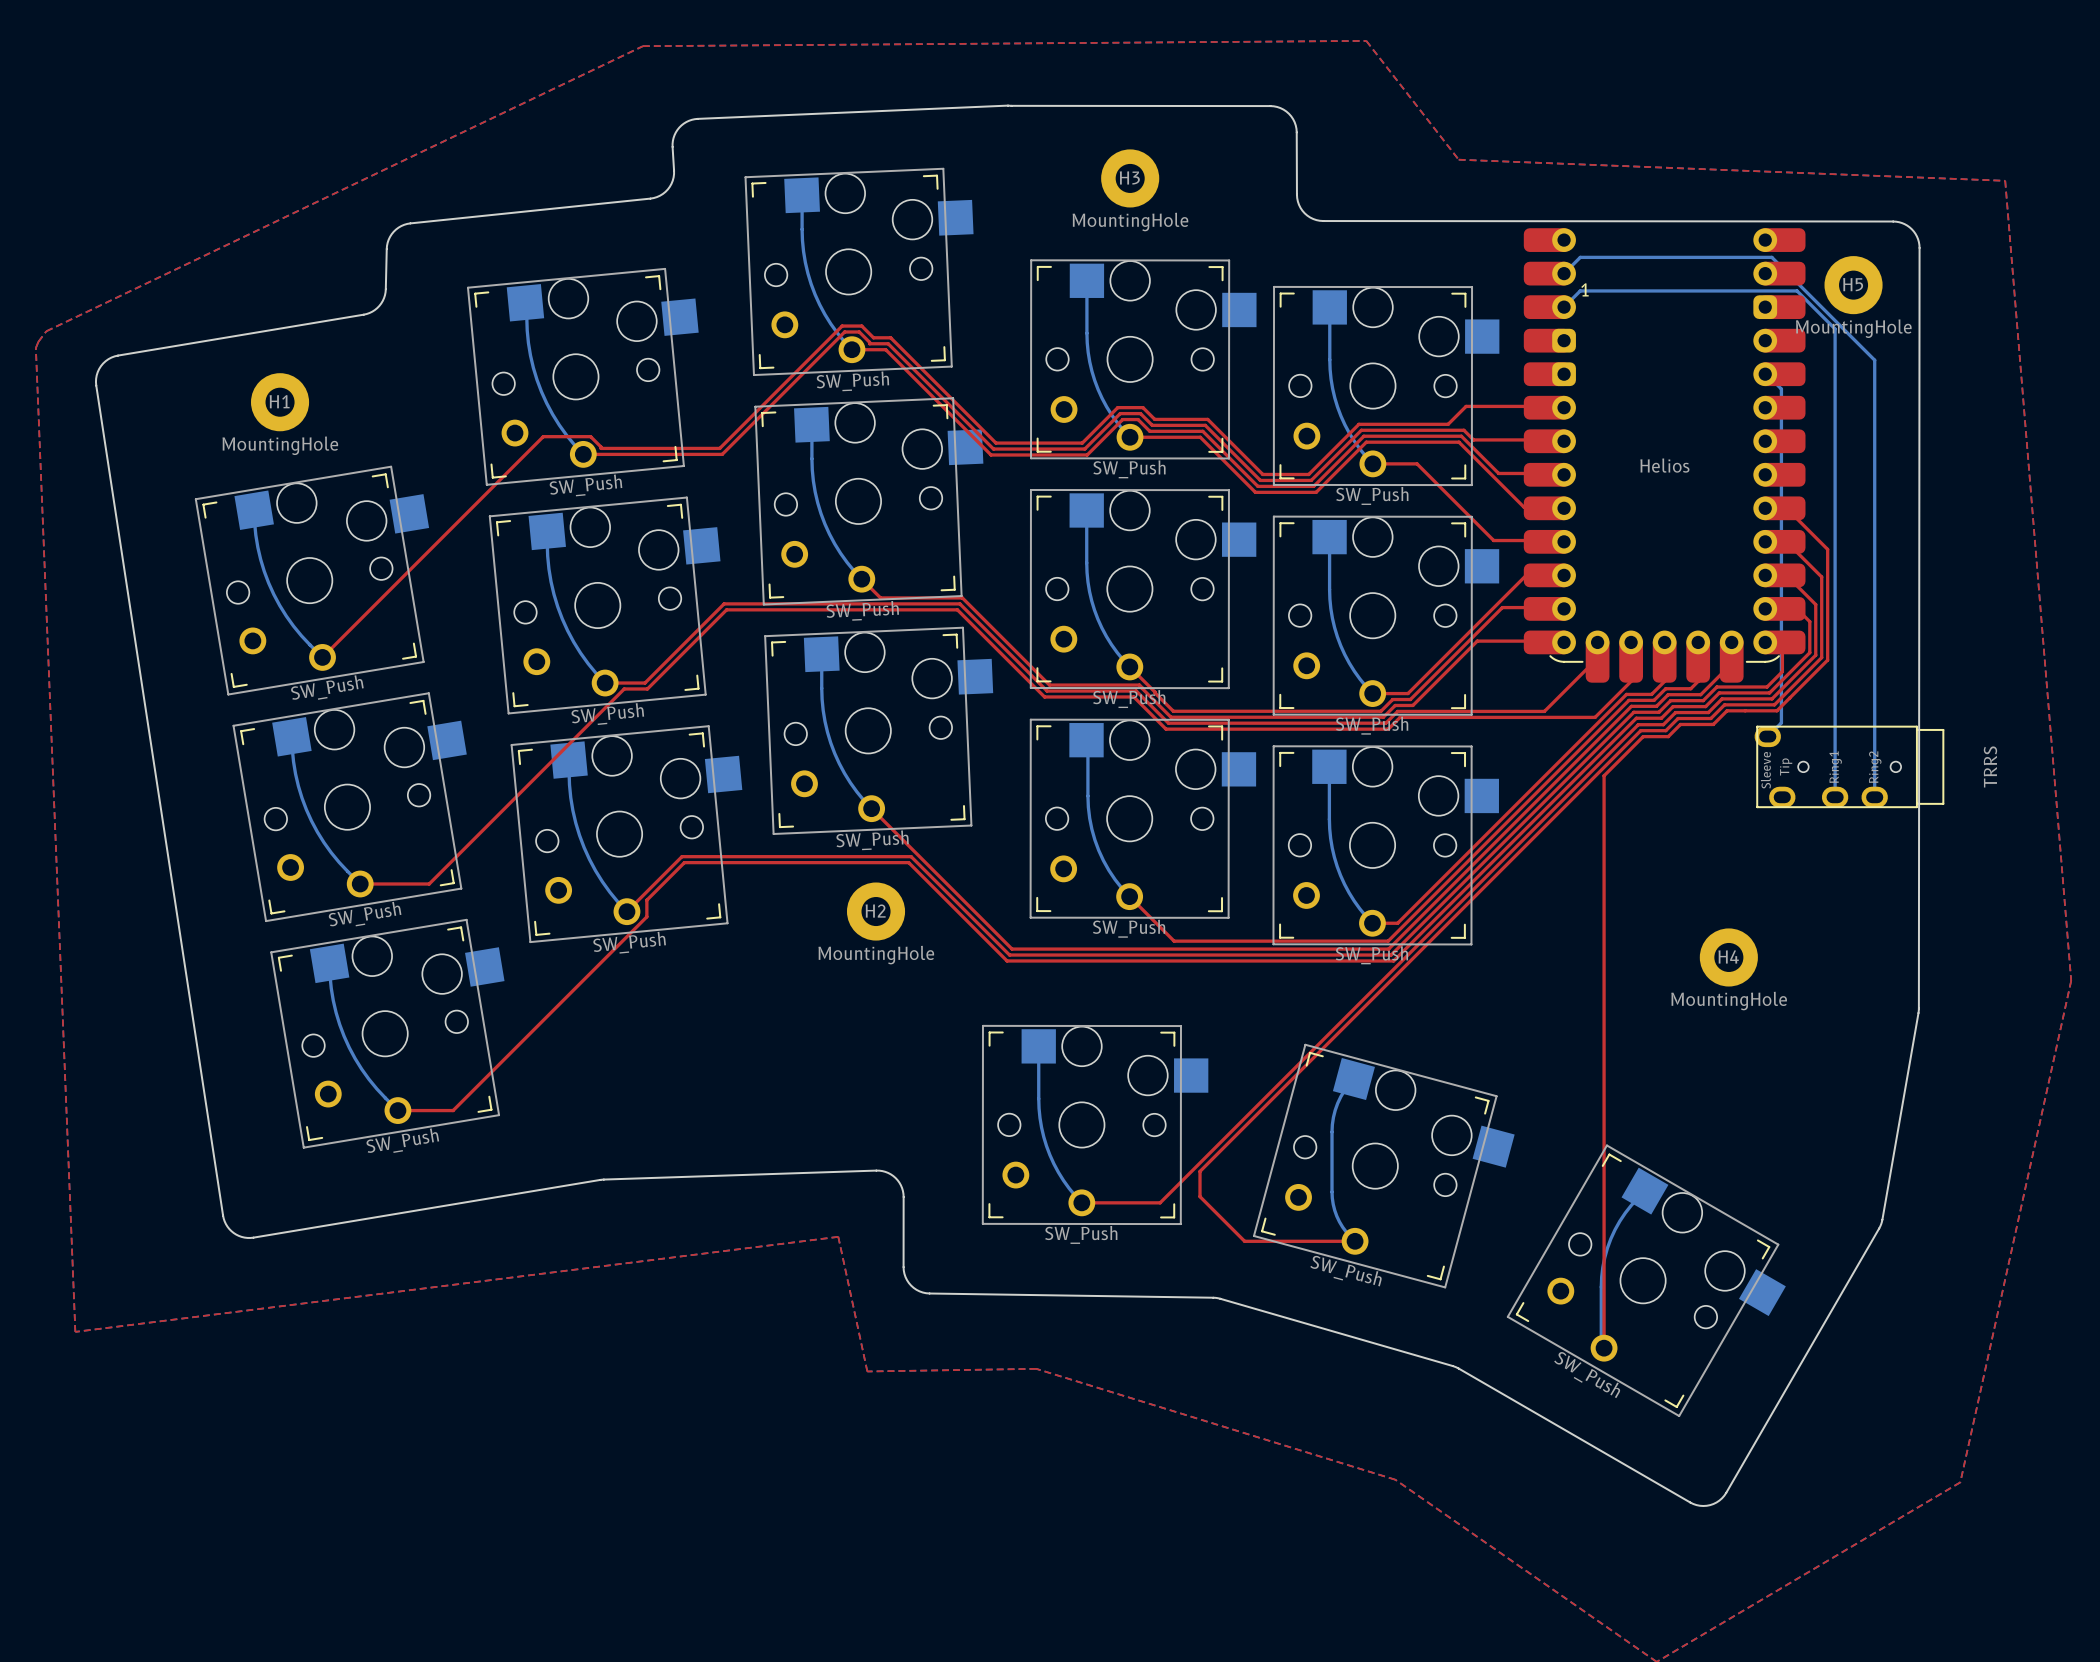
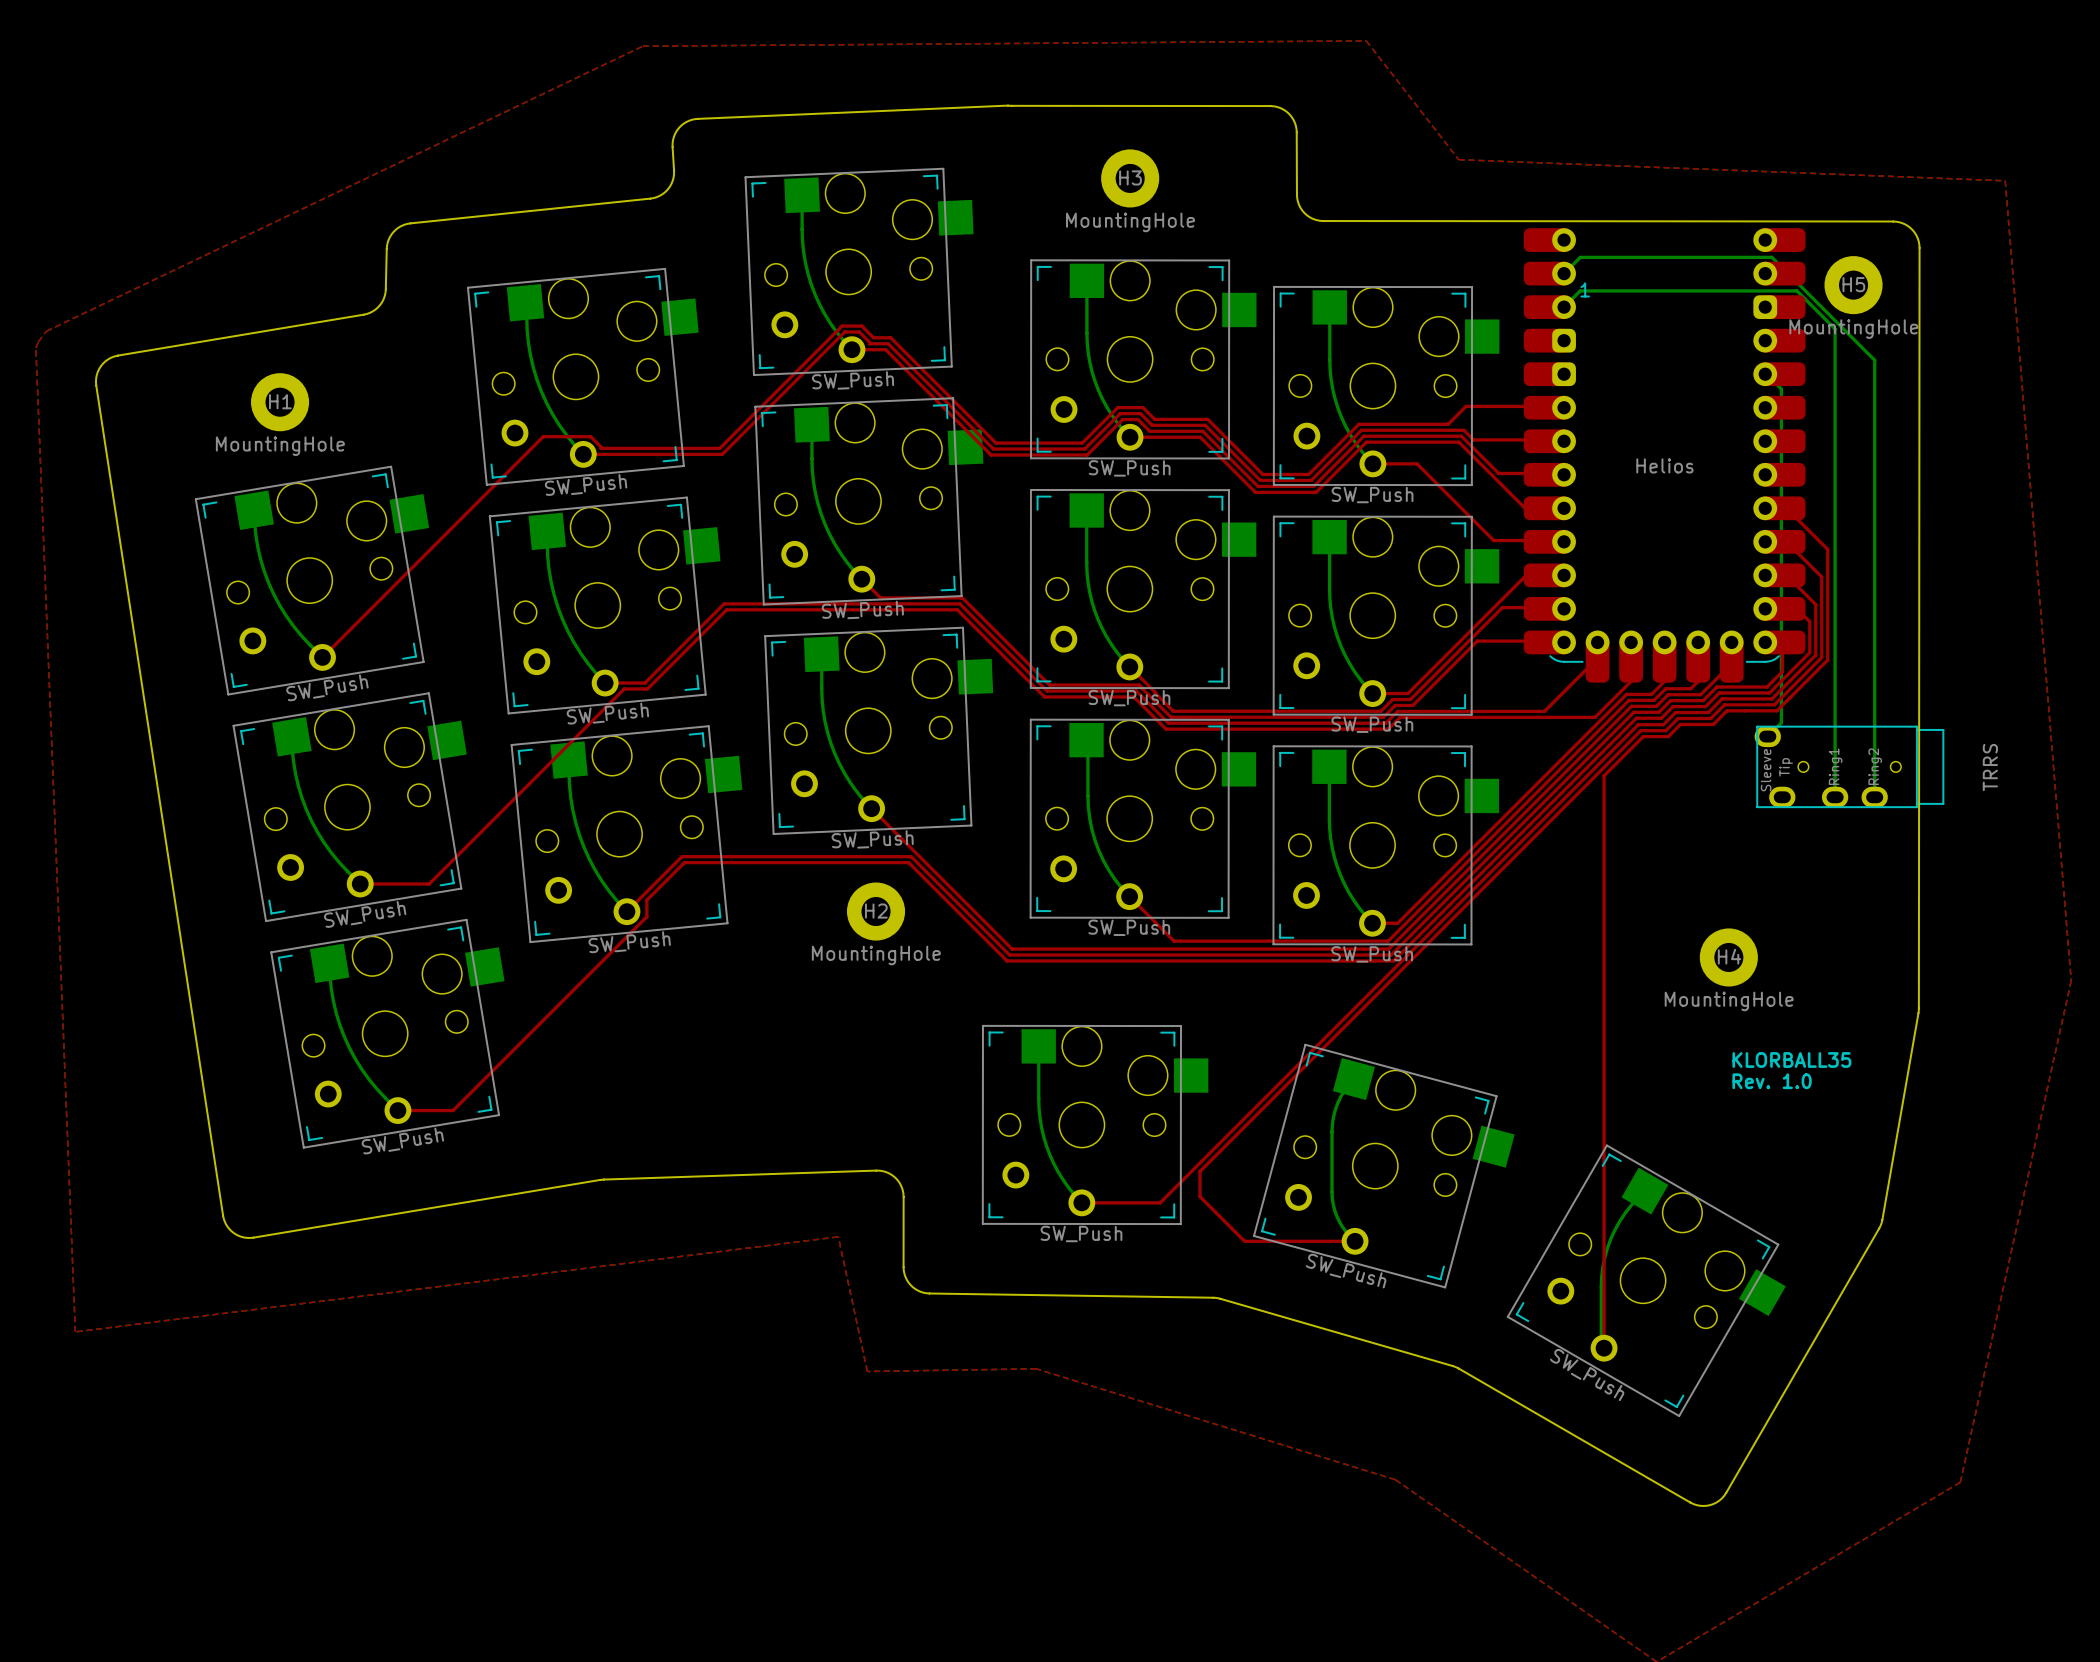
text: none -> KLORBALL35 (1791, 1060)
text: none -> Rev. 1.0 (1772, 1081)

